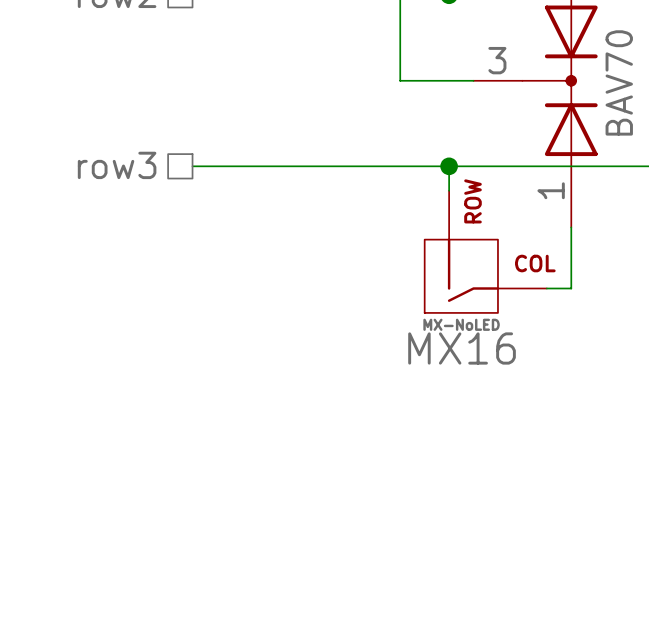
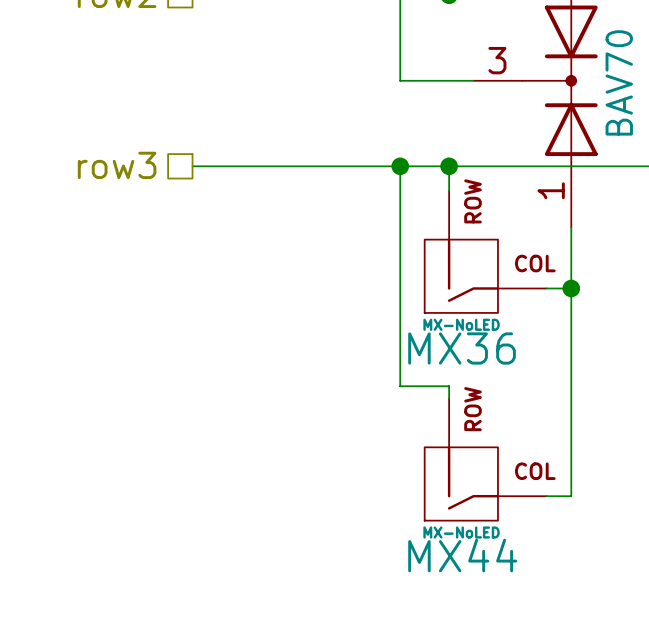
wire: none -> (400, 166) (400, 386) (449, 386) (449, 398)
junction: none -> (400, 166)
wire: none -> (571, 288) (571, 496) (546, 496)
junction: none -> (571, 288)
MX16 name: MX16 (462, 348) -> MX36 (462, 348)
MX44: none -> MX-NoLED (485, 459)

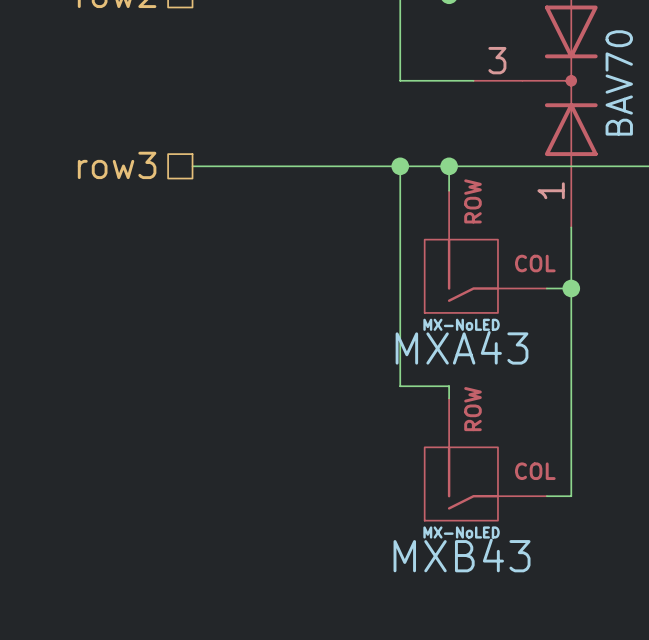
MX36 name: MX36 (462, 348) -> MXA43 (462, 347)
MX44 name: MX44 (462, 555) -> MXB43 (462, 555)

